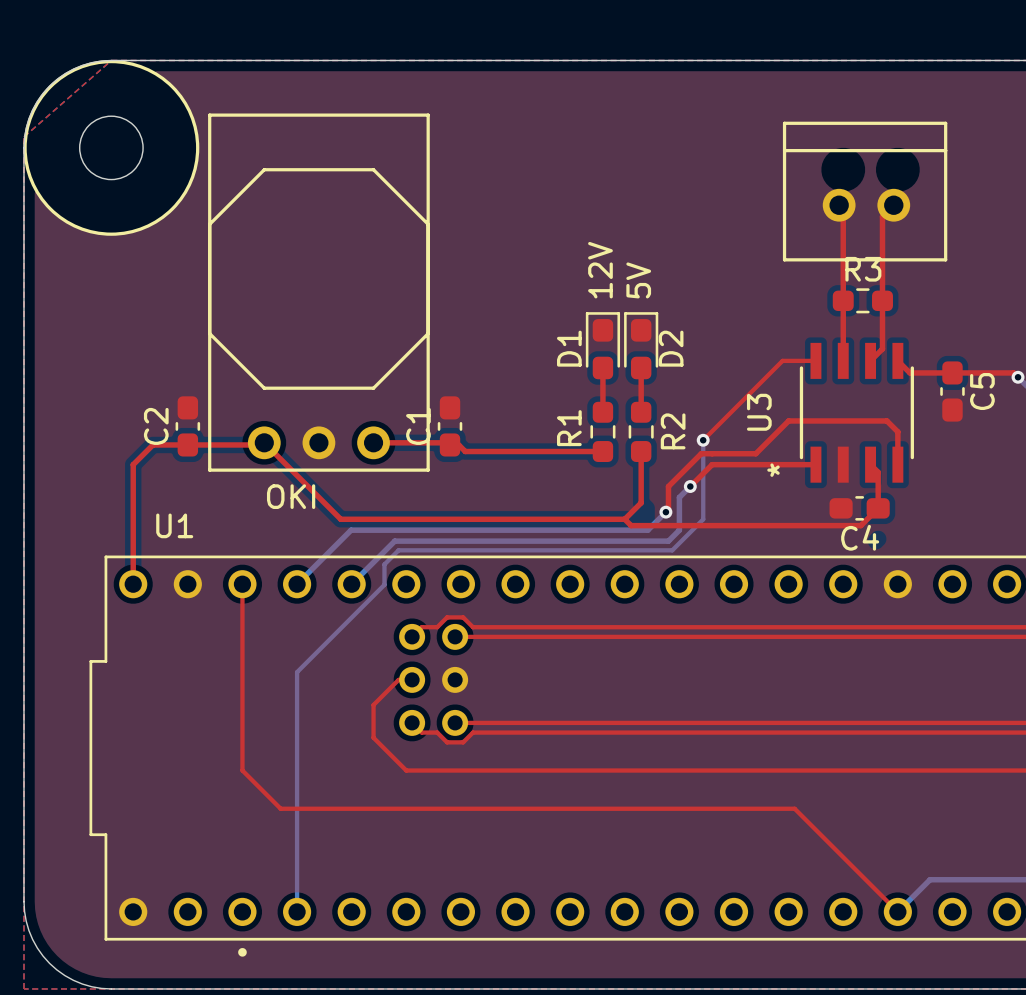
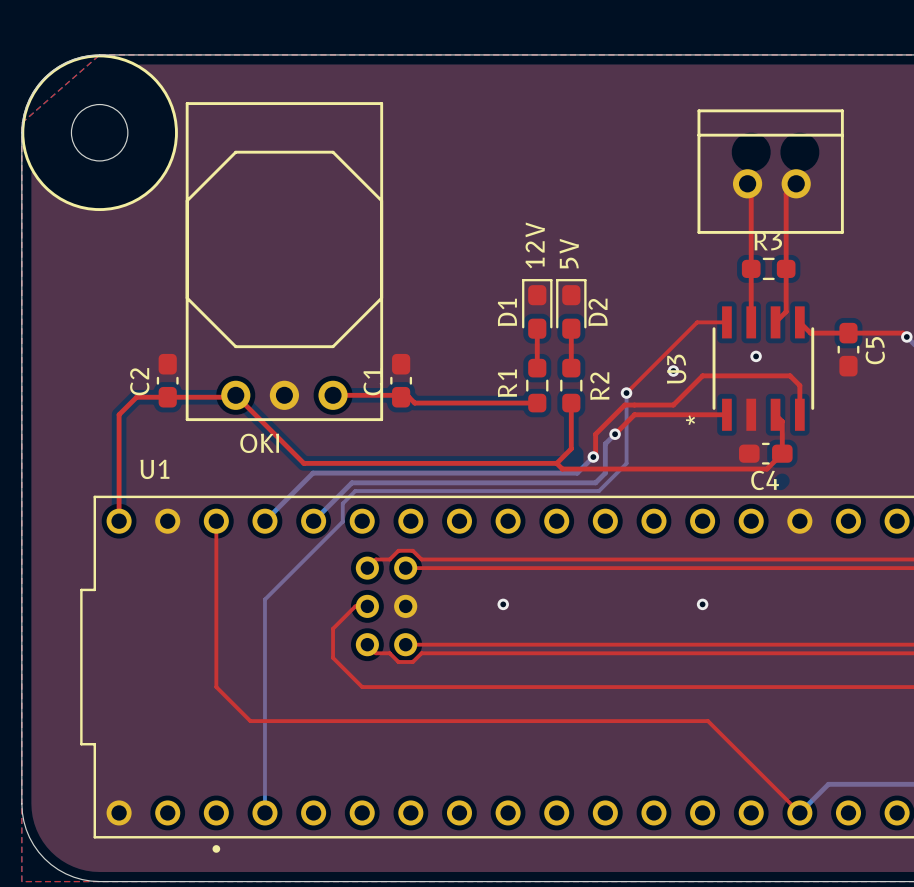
via: none -> (756, 356)
via: none -> (673, 371)
via: none -> (503, 604)
via: none -> (702, 604)

